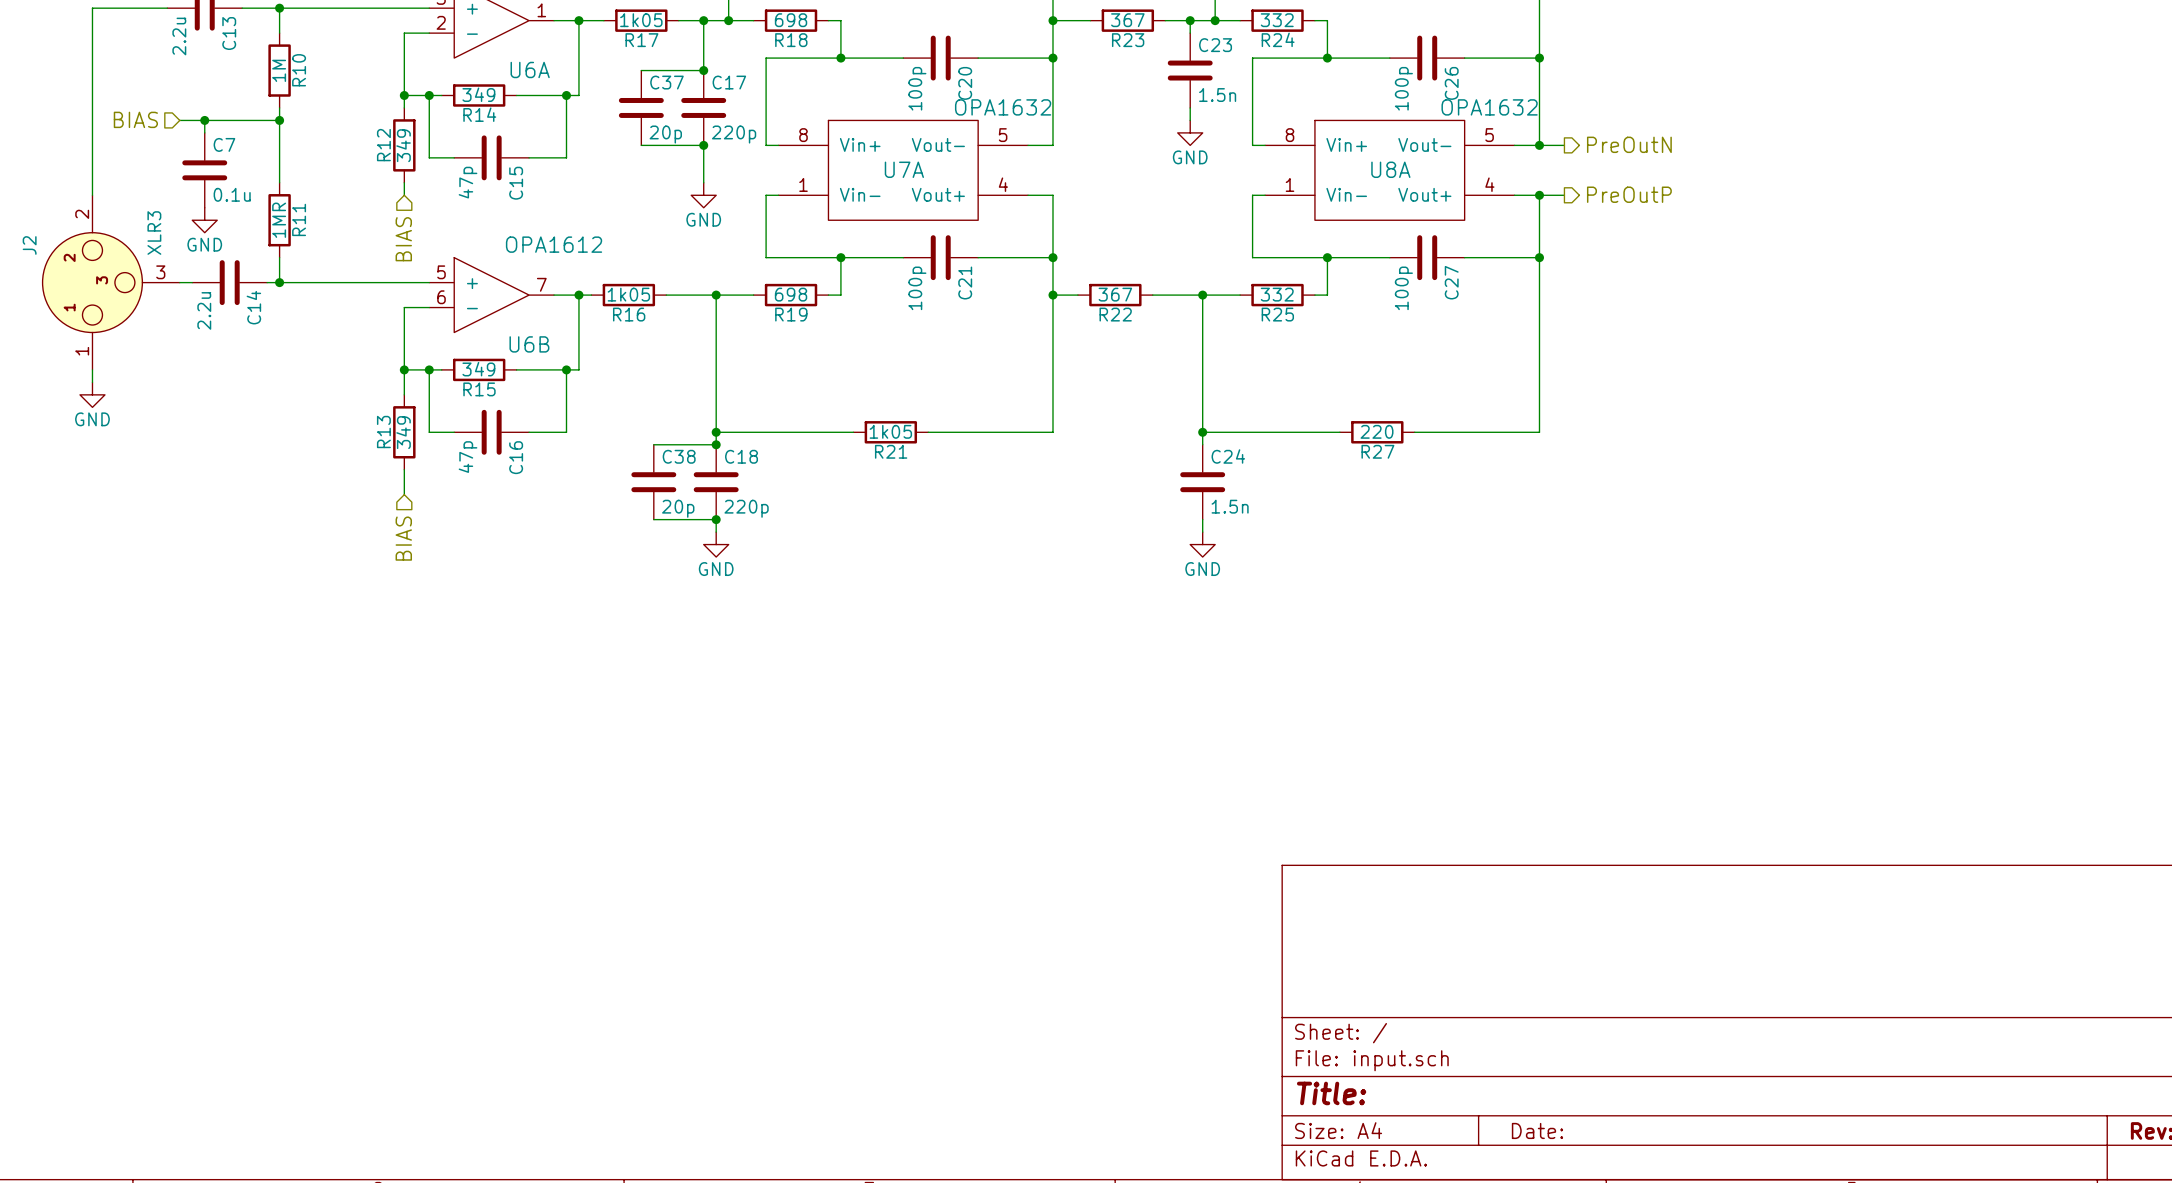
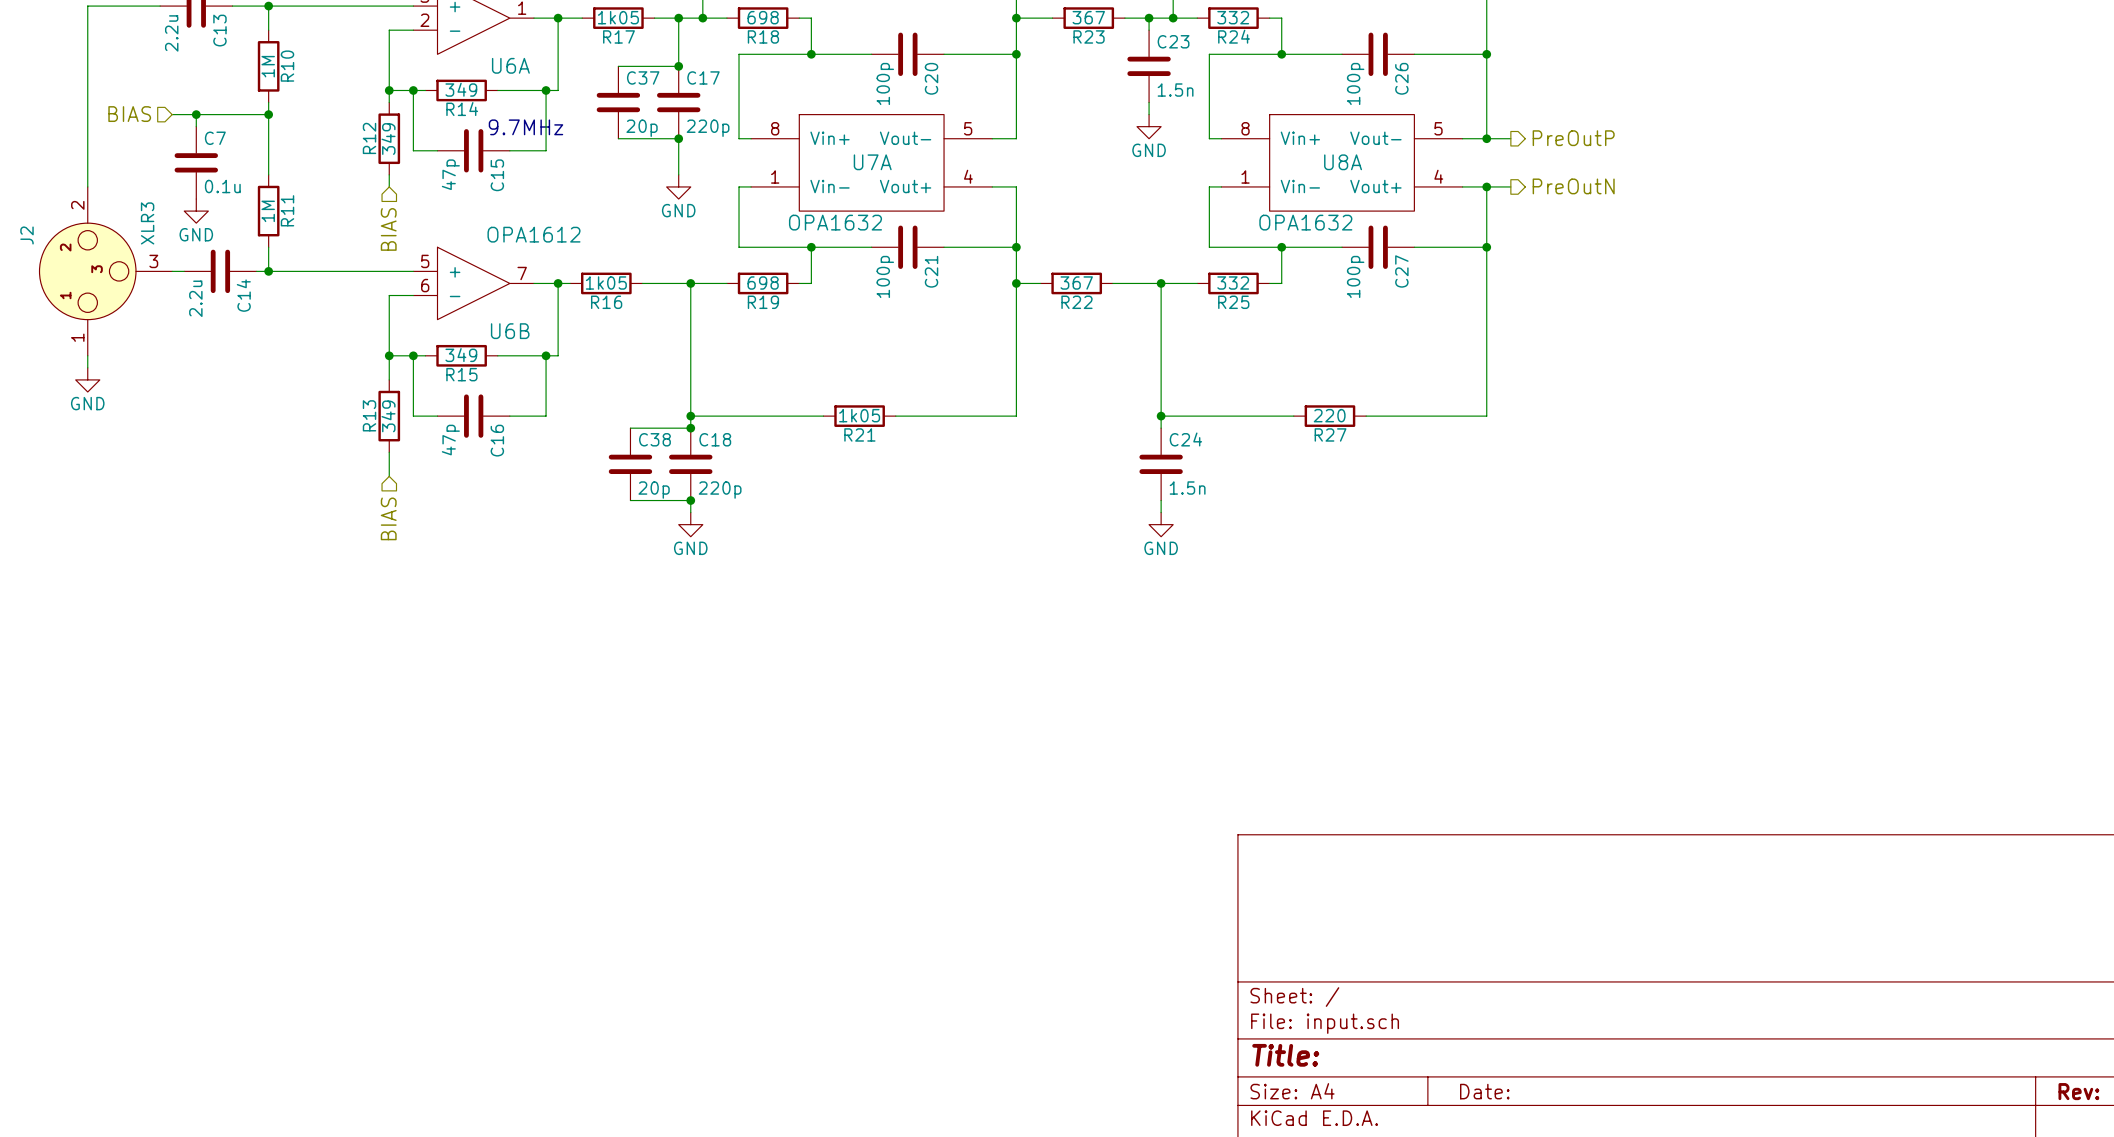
U7A value position: OPA1632 (1003, 107) -> OPA1632 (835, 222)
U8A value position: OPA1632 (1489, 107) -> OPA1632 (1305, 222)
text: none -> 9.7MHz (525, 127)
hierarchical label: PreOutN (1629, 144) -> PreOutP (1573, 138)
hierarchical label: PreOutP (1629, 194) -> PreOutN (1573, 186)
R11 value: 1MR (279, 220) -> 1M (268, 211)

